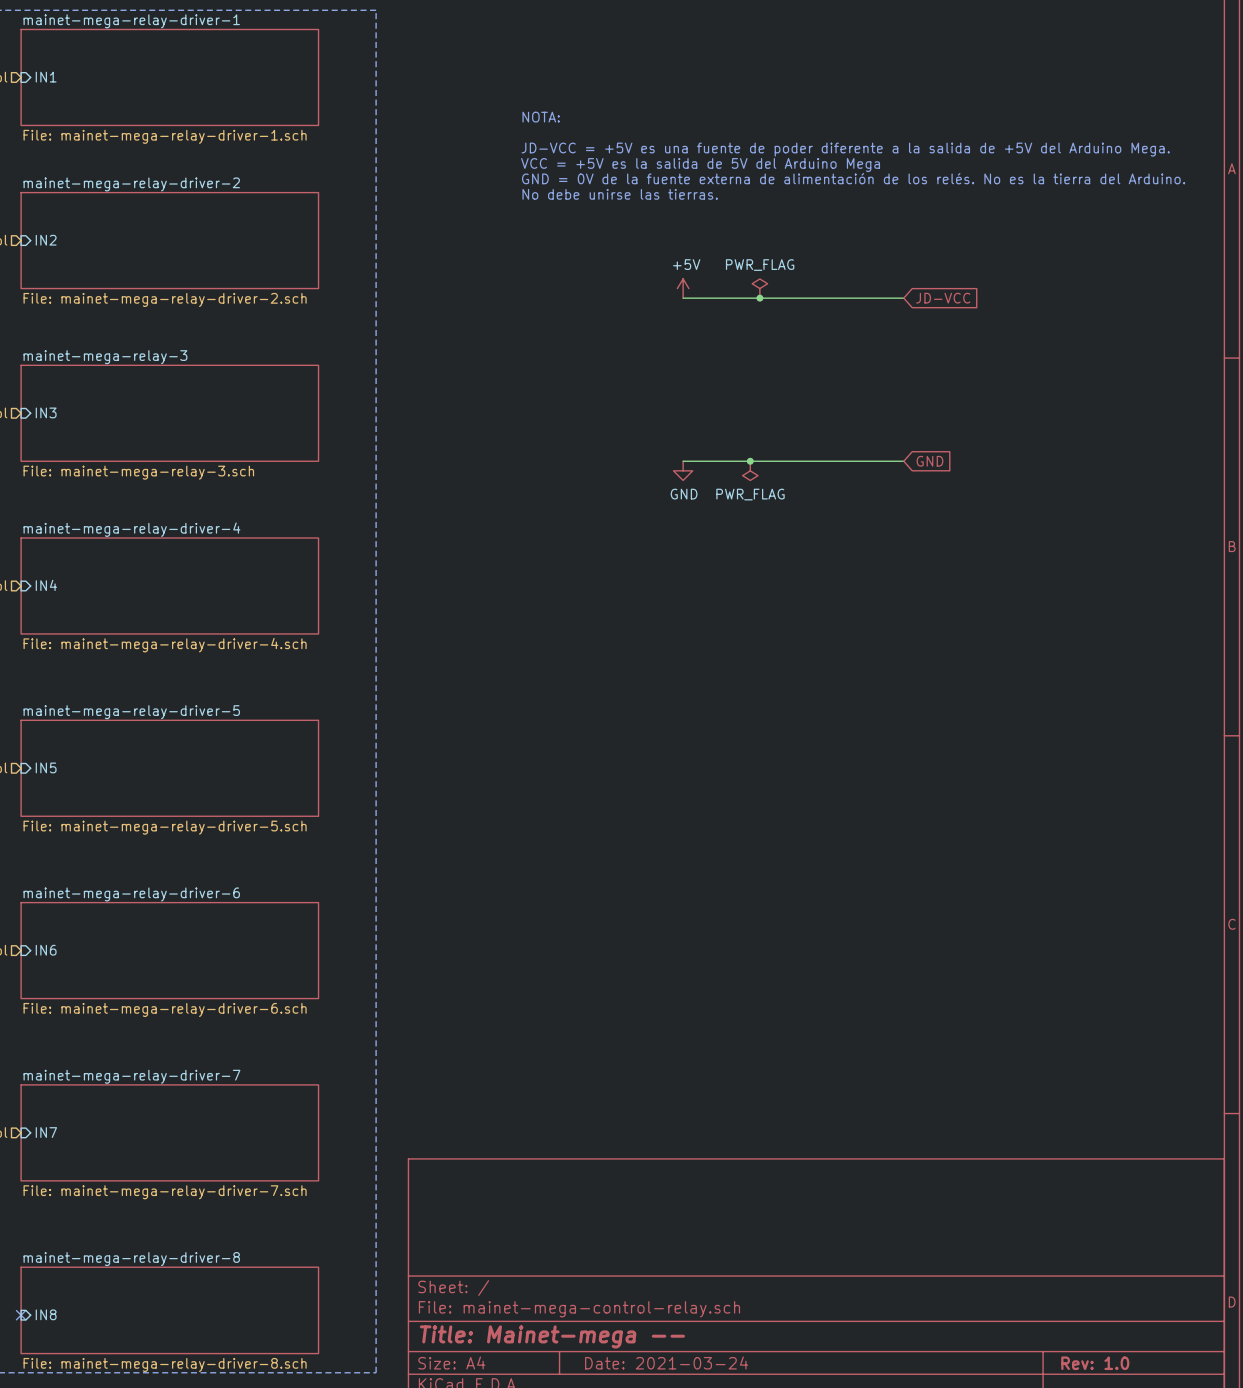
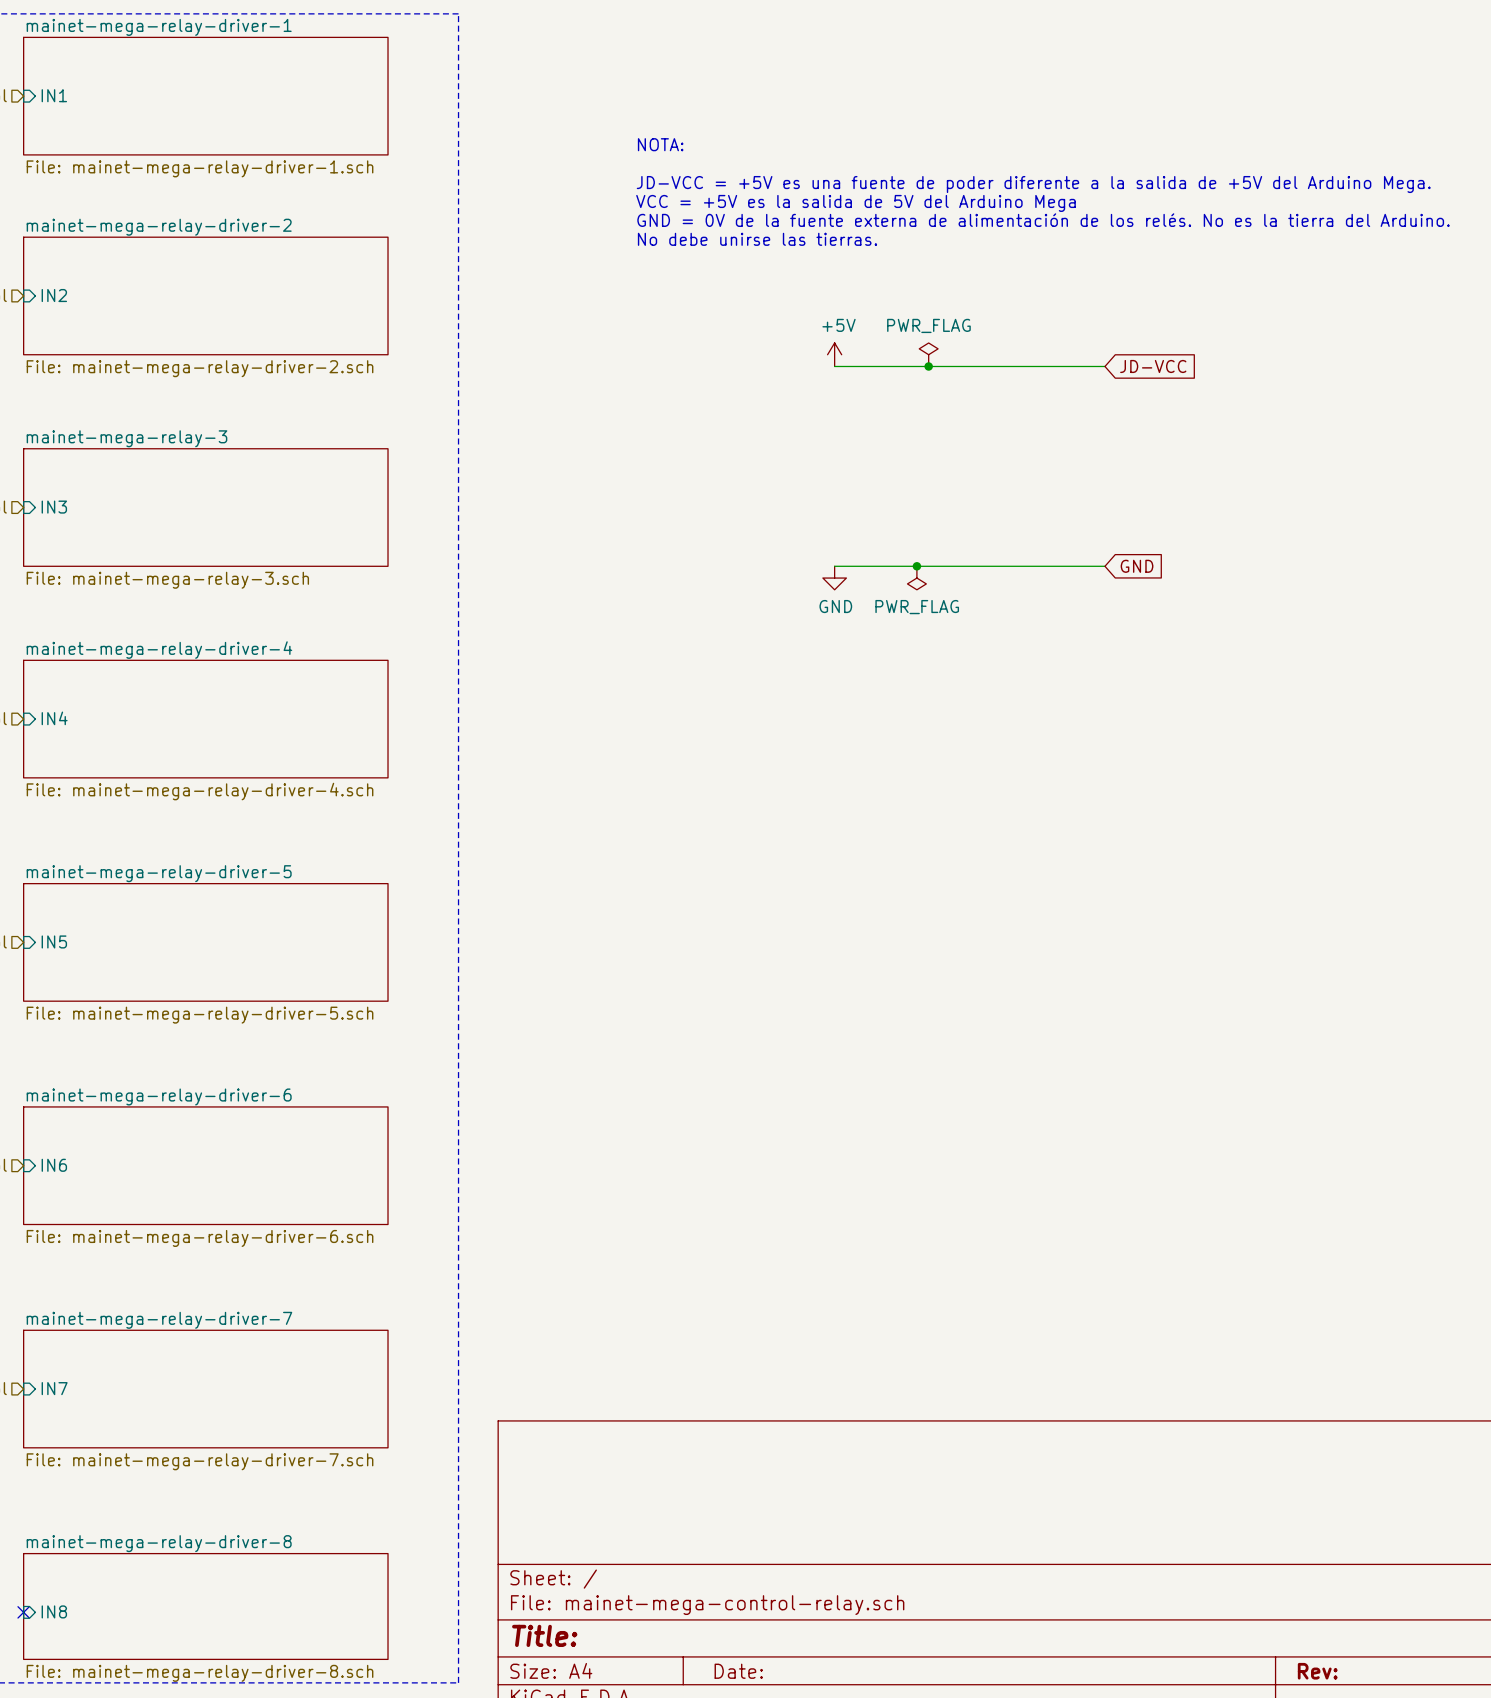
title block: Title: Mainet-mega -- (552, 1336) -> Title: (544, 1635)
title block: Date: 2021-03-24 (666, 1362) -> Date: (738, 1671)
title block: Rev: 1.0 (1095, 1363) -> Rev: (1317, 1671)

